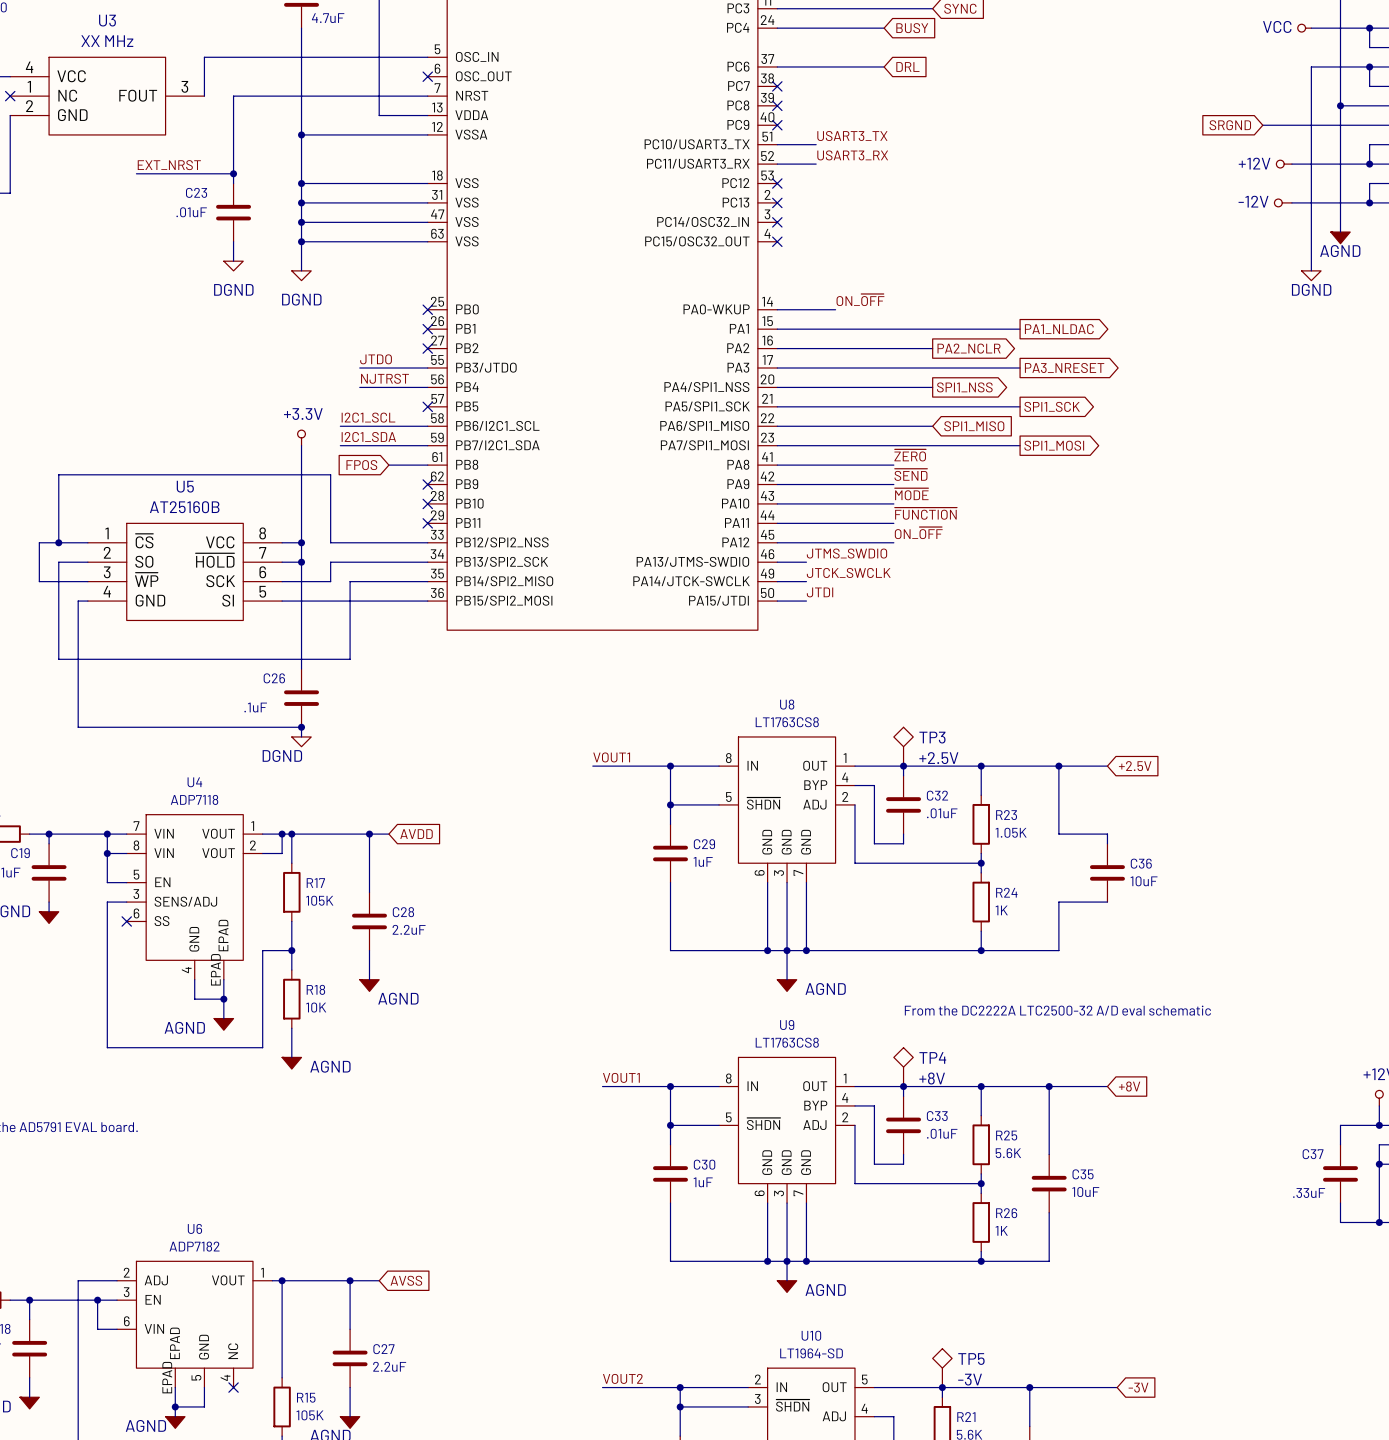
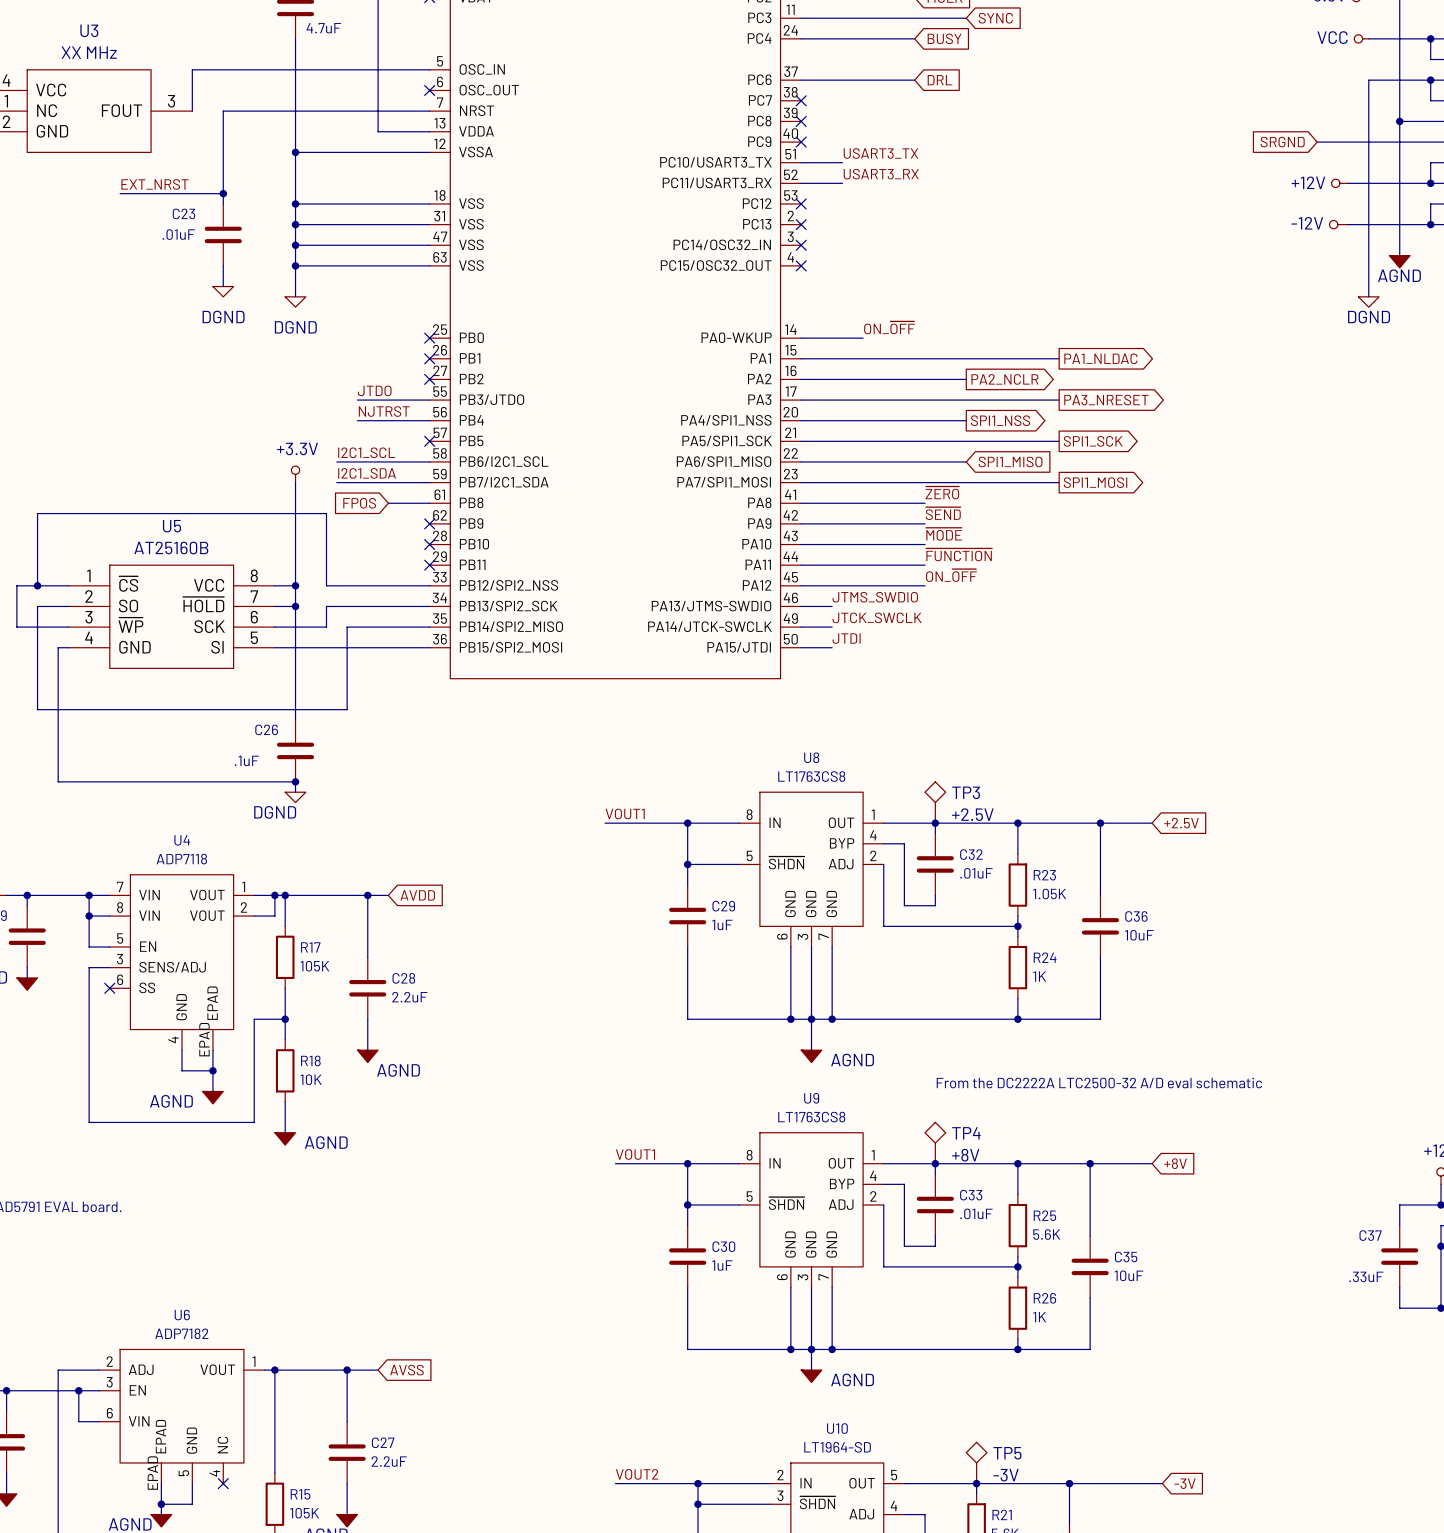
wire: (1058, 834) (1107, 834) (1107, 843) -> none
C36 position: (1107, 872) -> (1100, 926)
wire: (1058, 902) (1107, 902) -> (1100, 967) (1100, 957)

